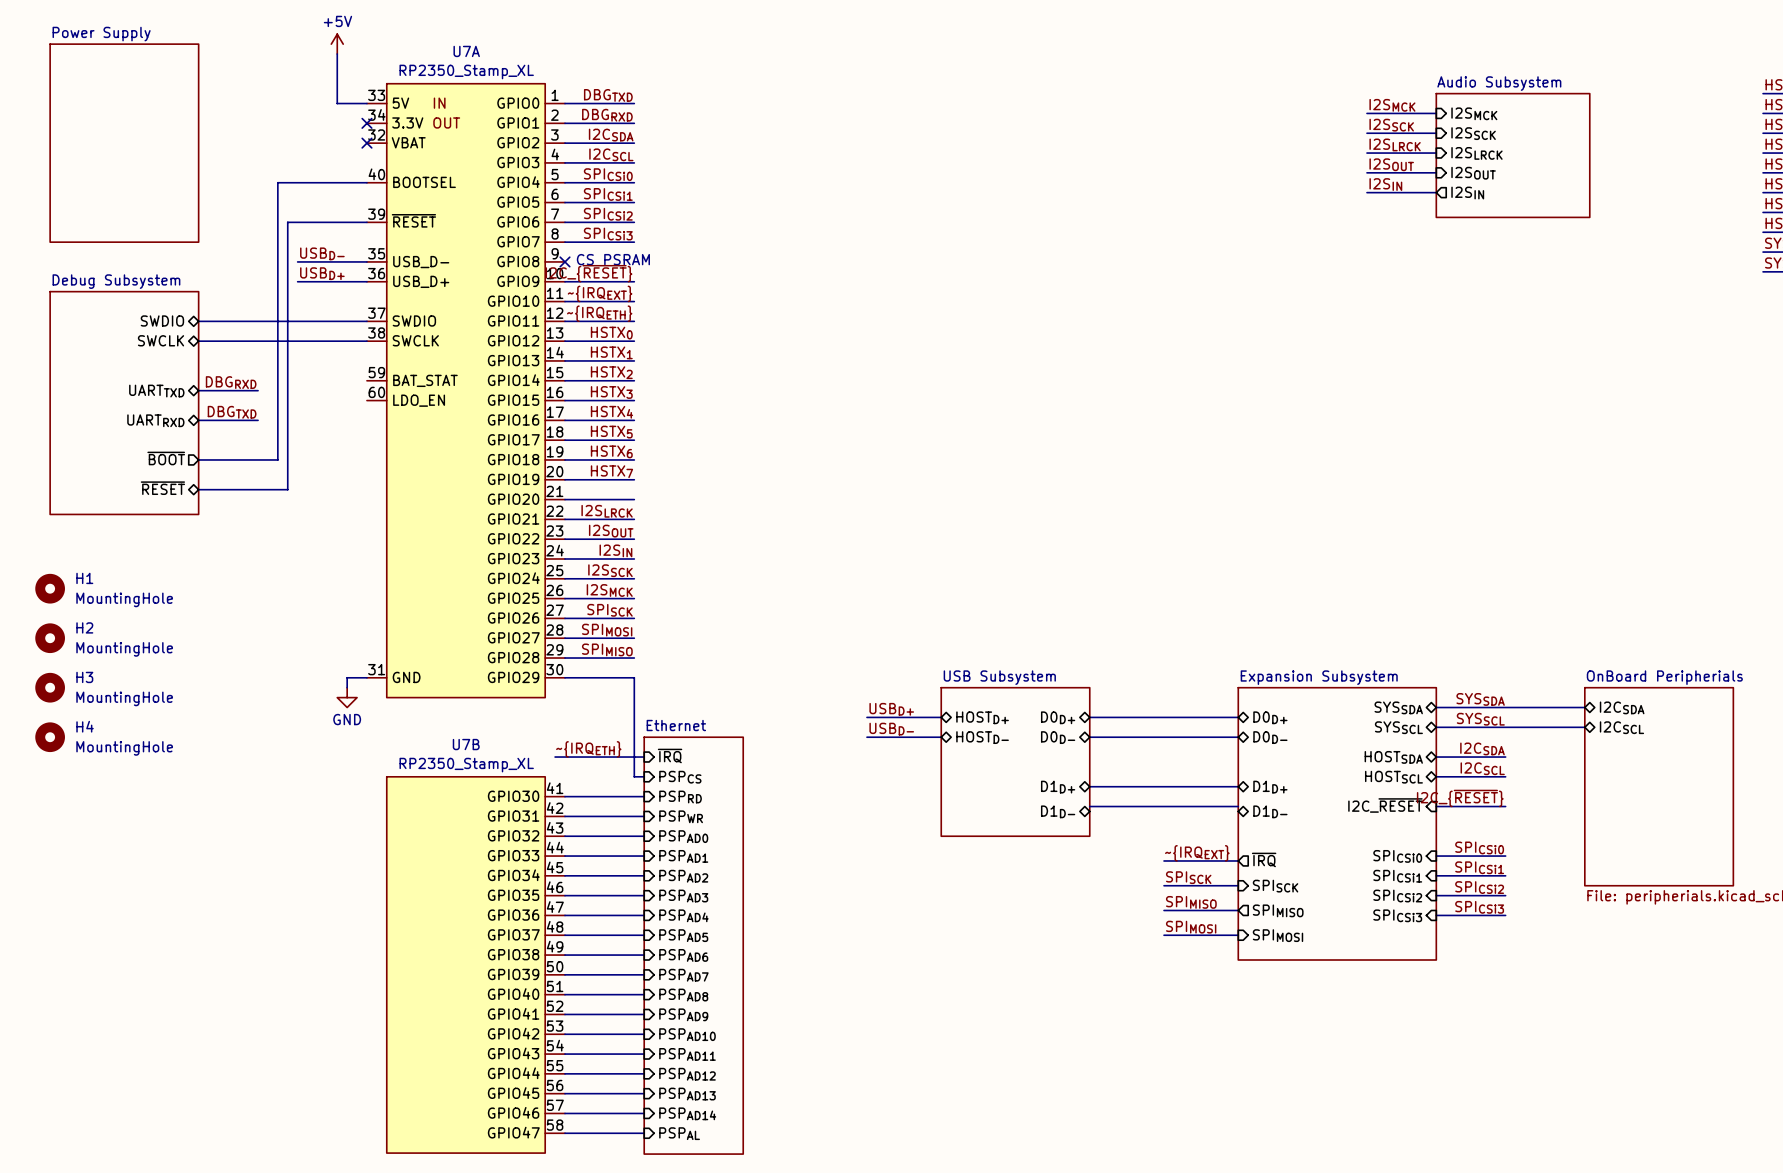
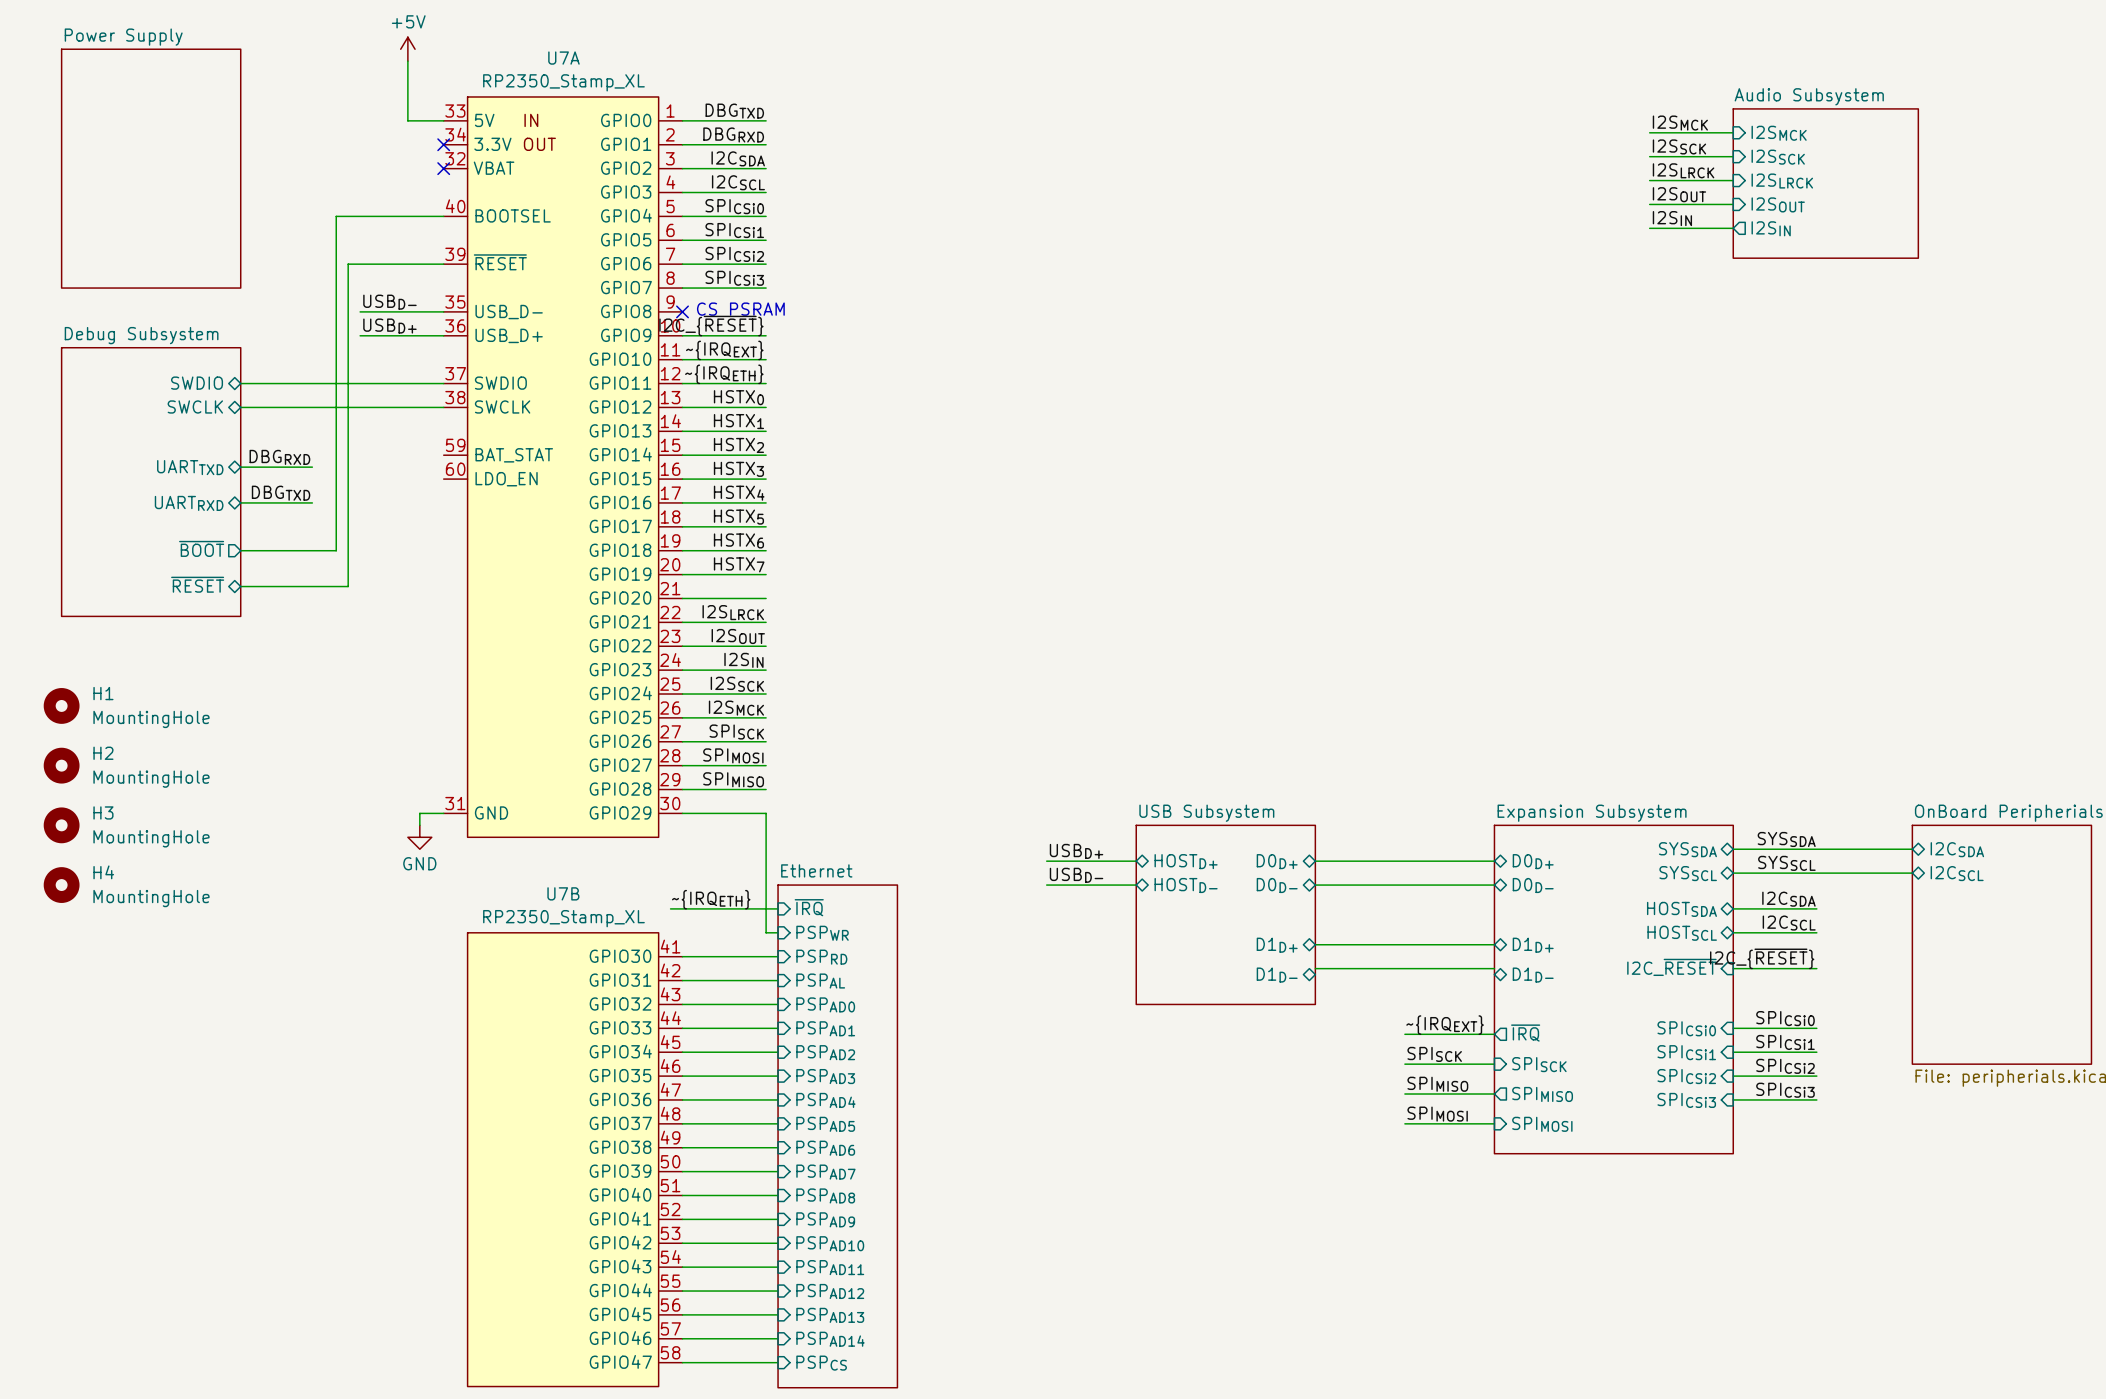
sheet pin: PSPCS (680, 777) -> PSPWR (822, 933)
sheet pin: PSPWR (681, 816) -> PSPAL (820, 981)
sheet pin: PSPAL (679, 1133) -> PSPCS (821, 1363)

